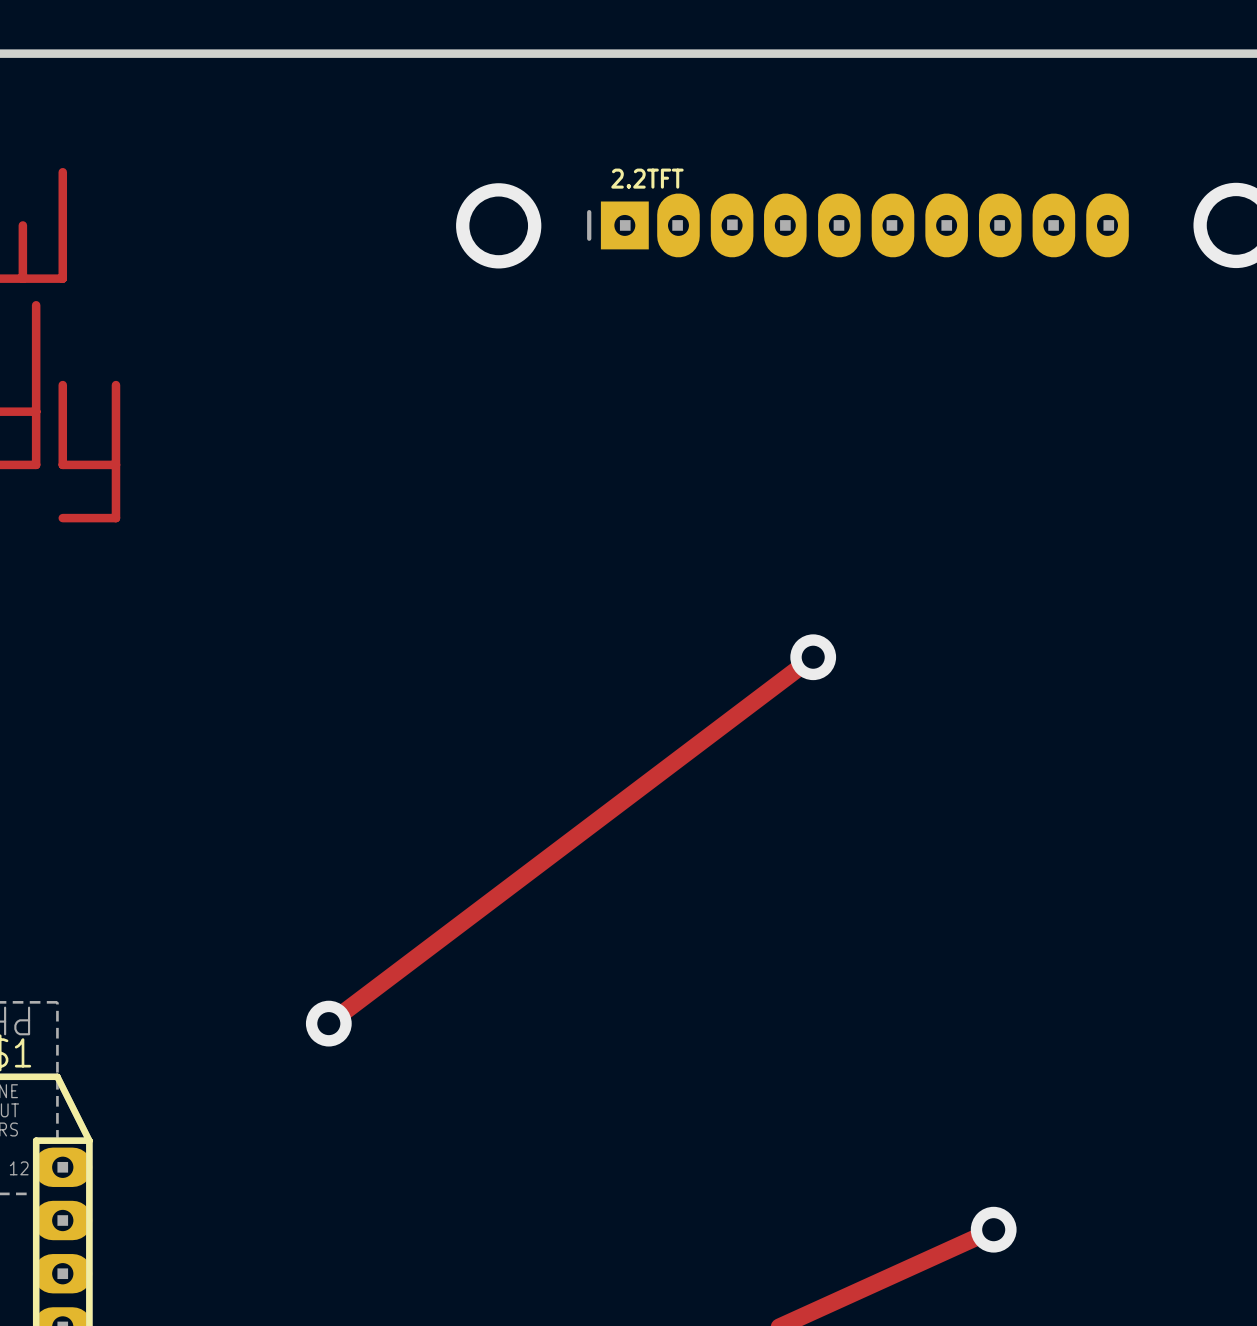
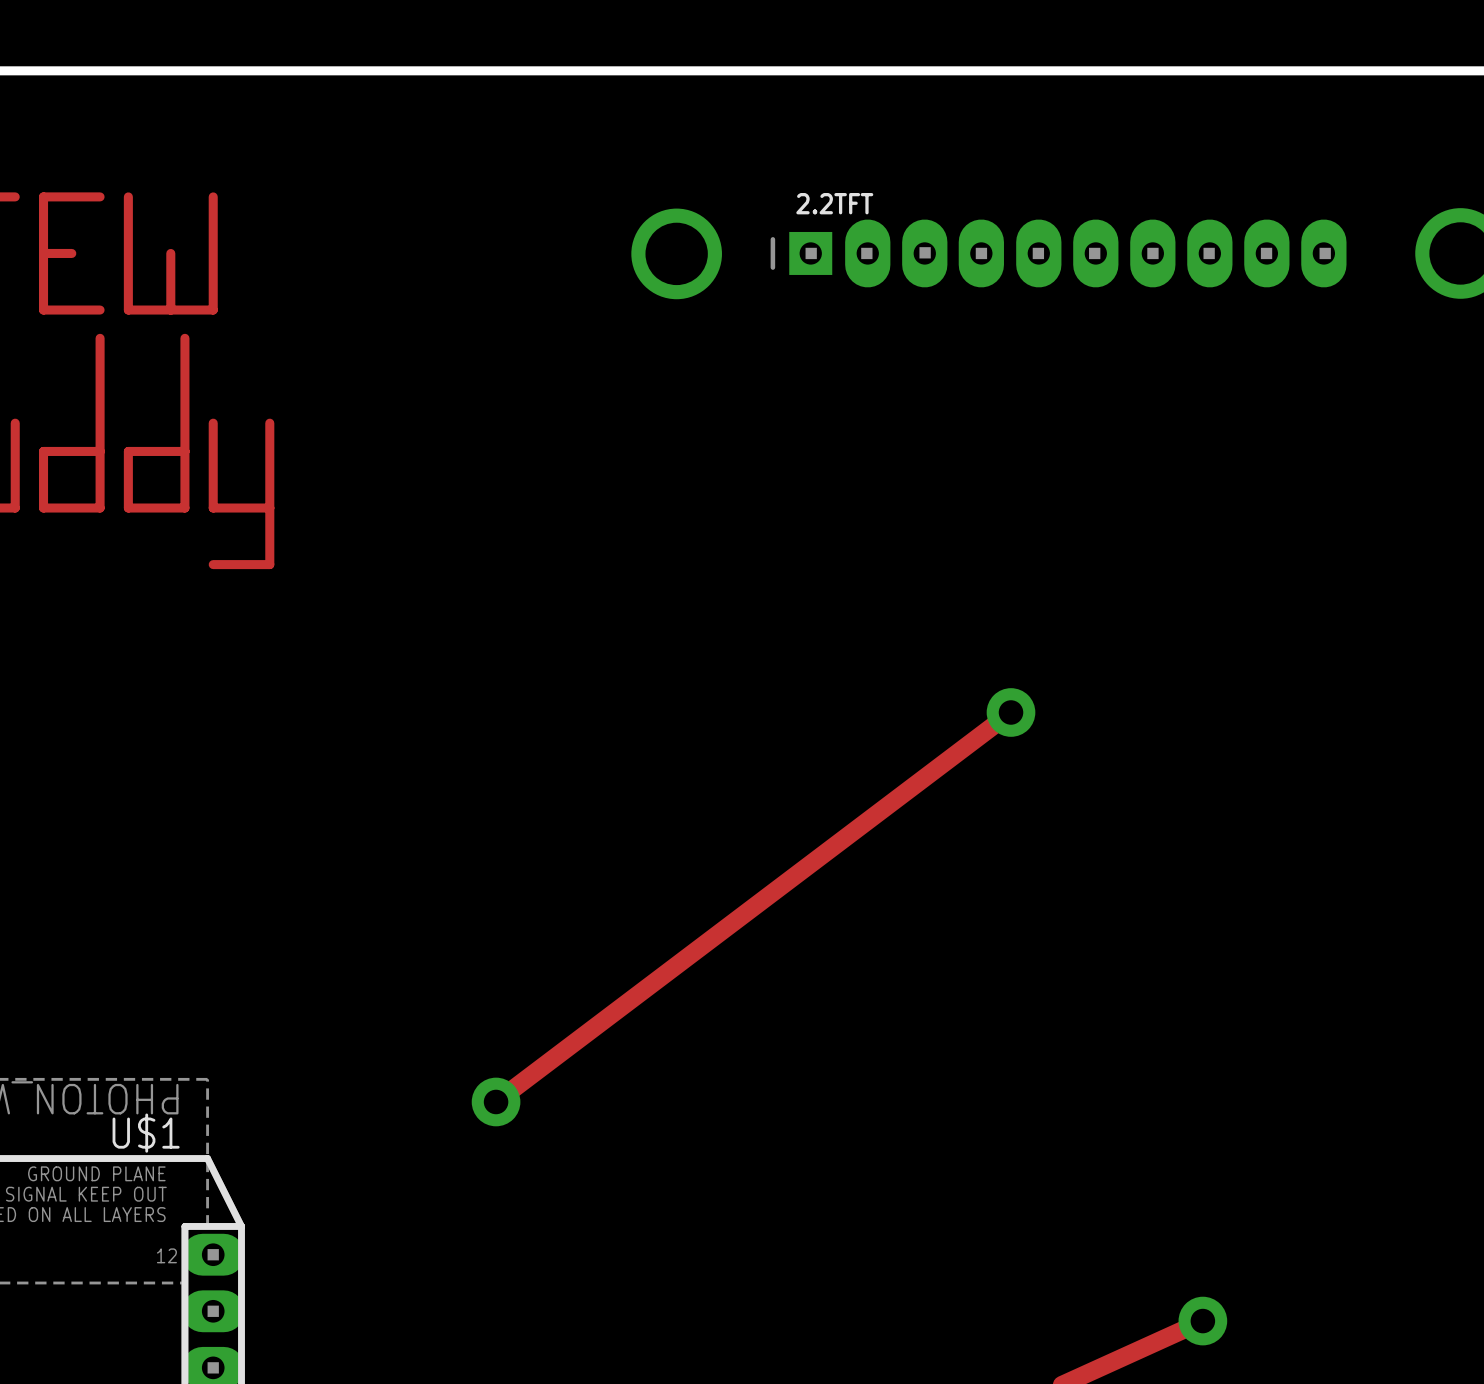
2.2TFT footprint: [587, 193, 1129, 258] -> [770, 219, 1347, 288]

